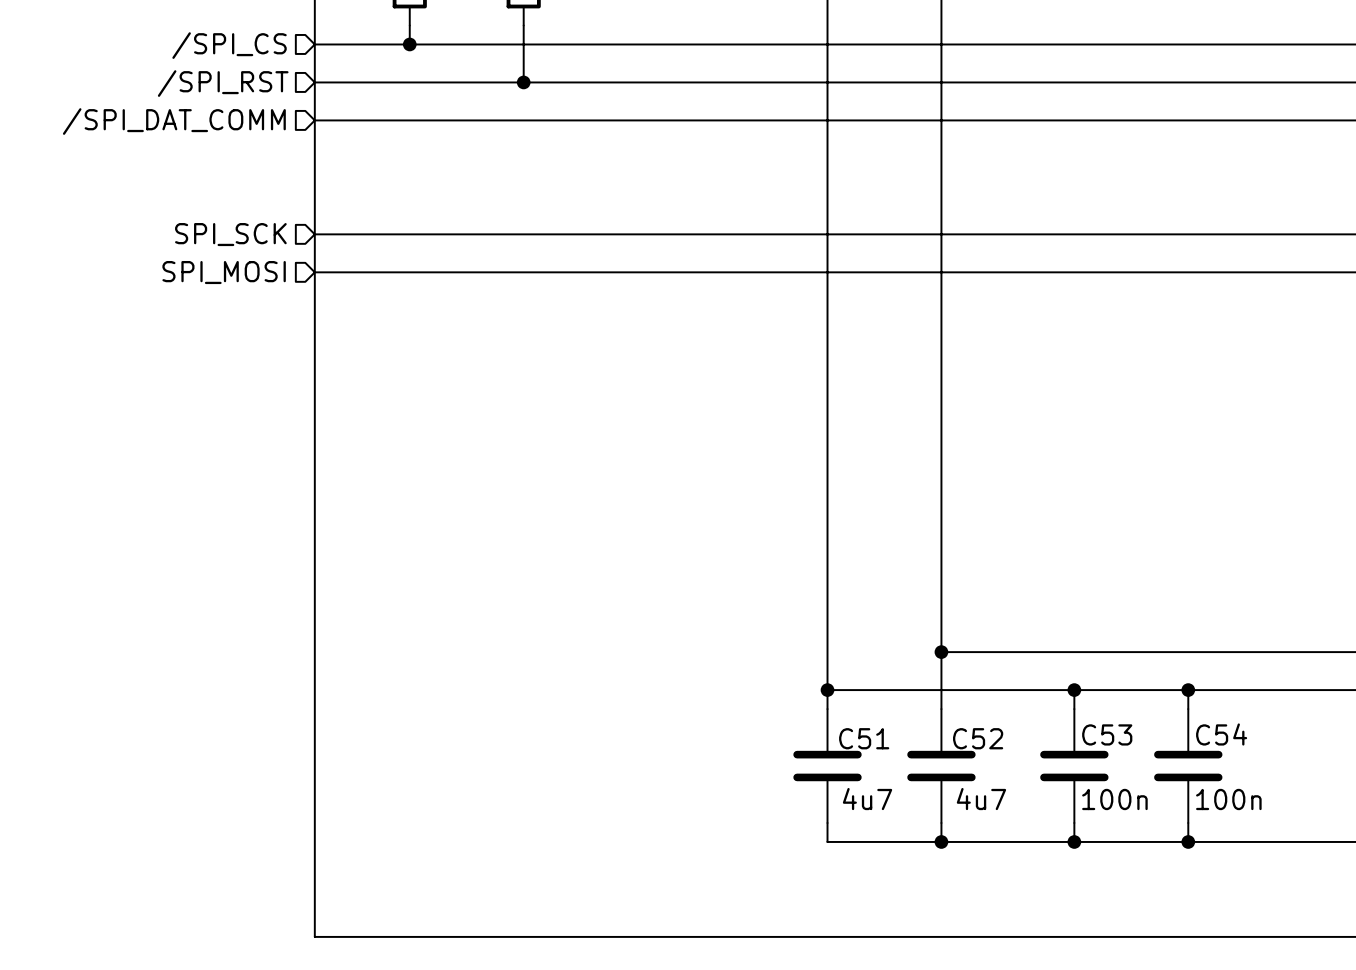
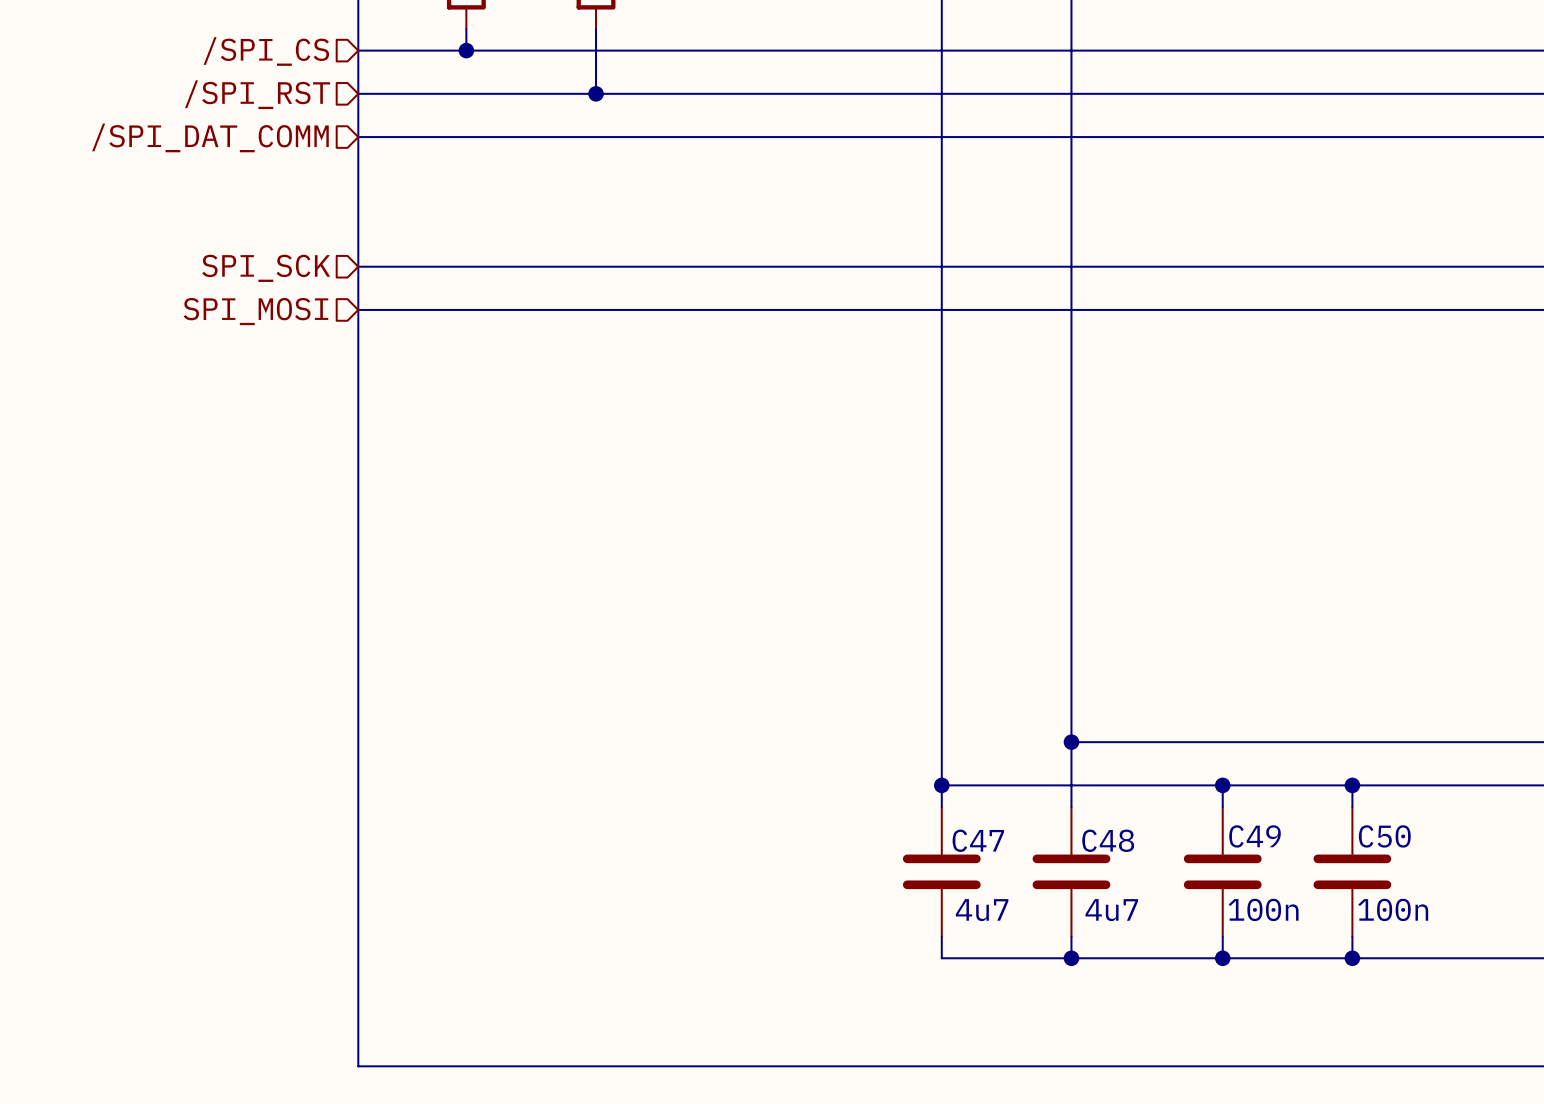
C53 name: C53 (1107, 734) -> C49 (1255, 836)
C54 name: C54 (1221, 734) -> C50 (1384, 836)
C51 name: C51 (864, 738) -> C47 (978, 840)
C52 name: C52 (978, 738) -> C48 (1108, 840)

